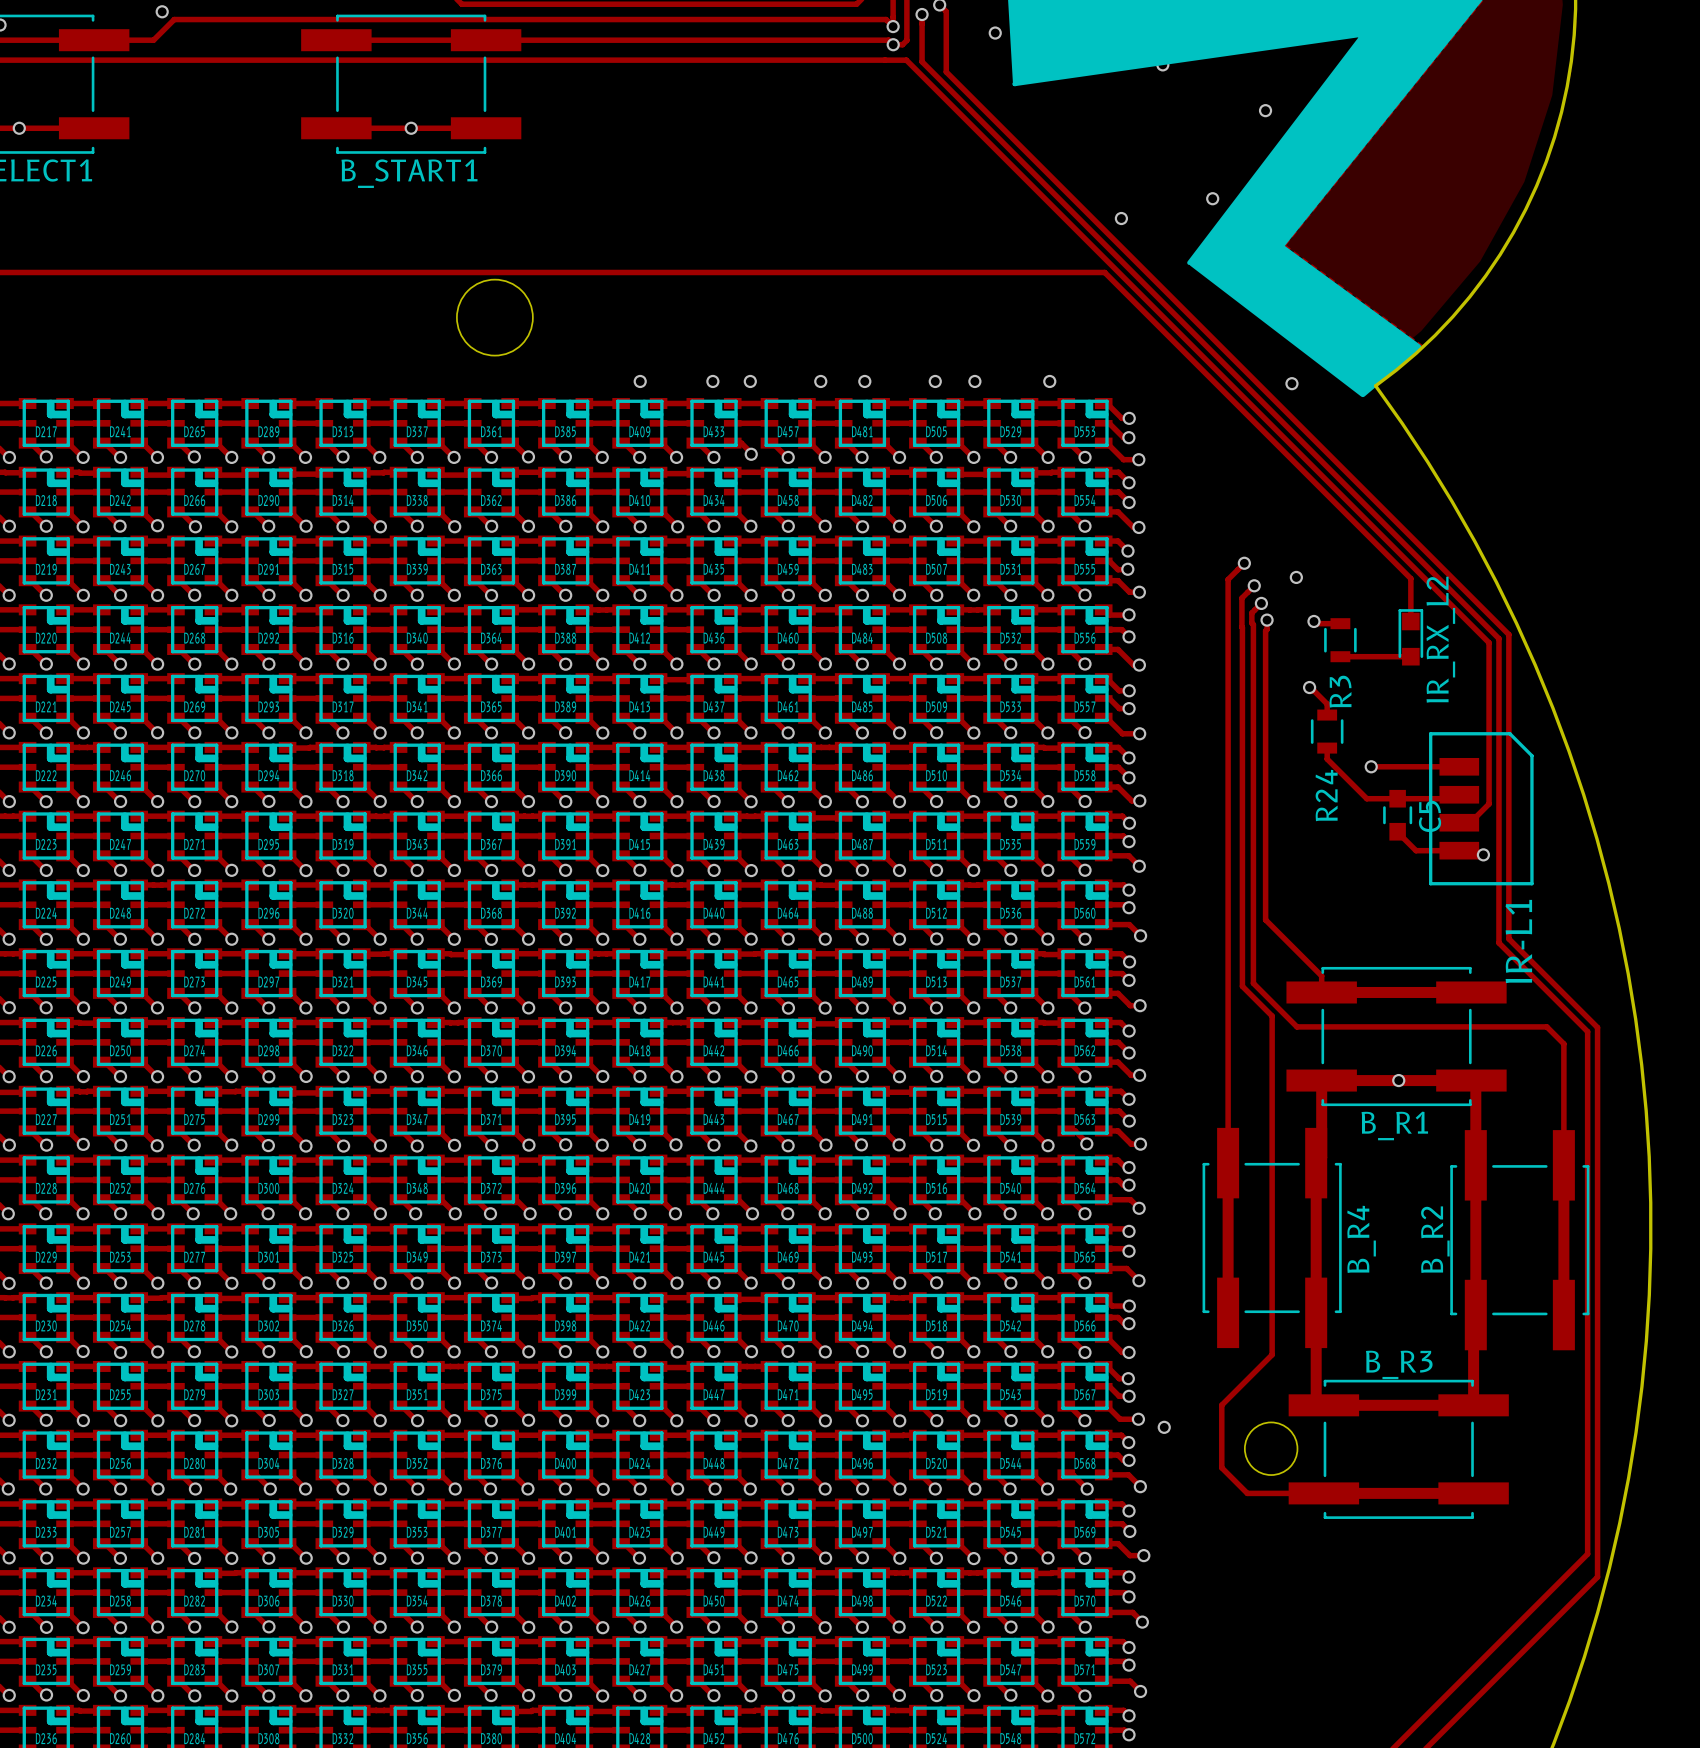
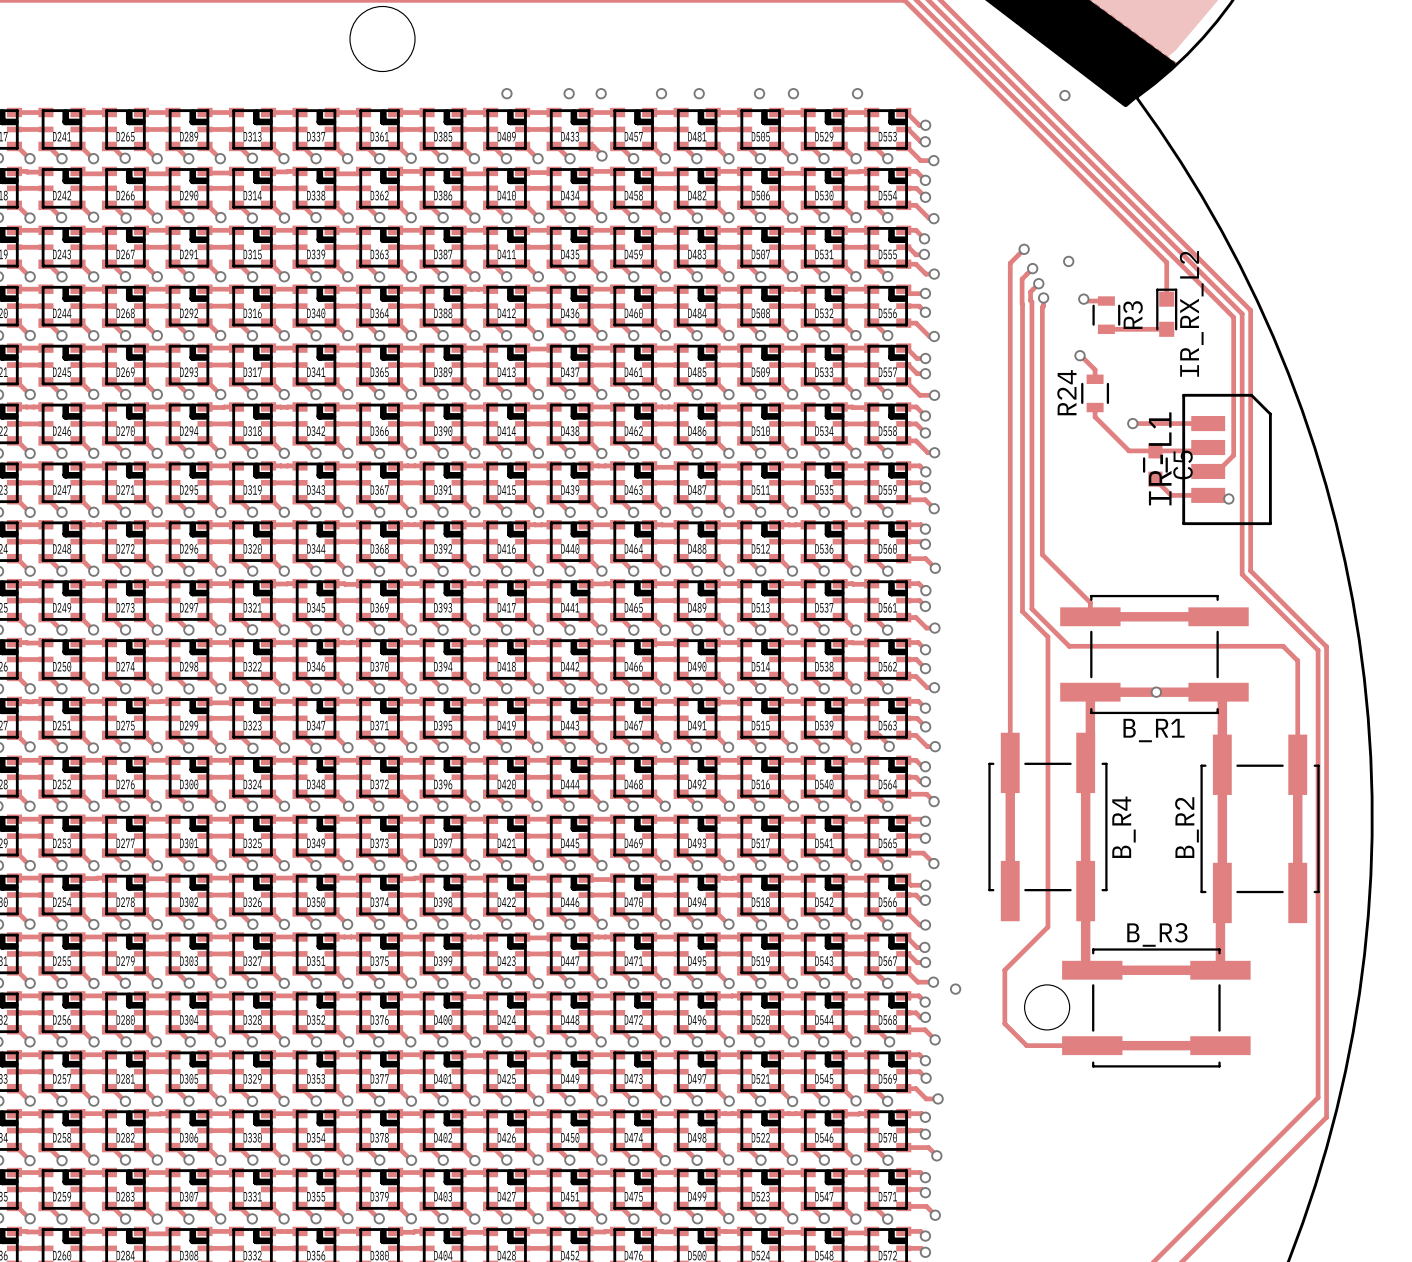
R3 name position: R3 (1340, 691) -> R3 (1133, 315)
R24 name position: R24 (1326, 795) -> R24 (1066, 392)
IR-L1 name position: IR-L1 (1518, 941) -> IR-L1 (1160, 458)

